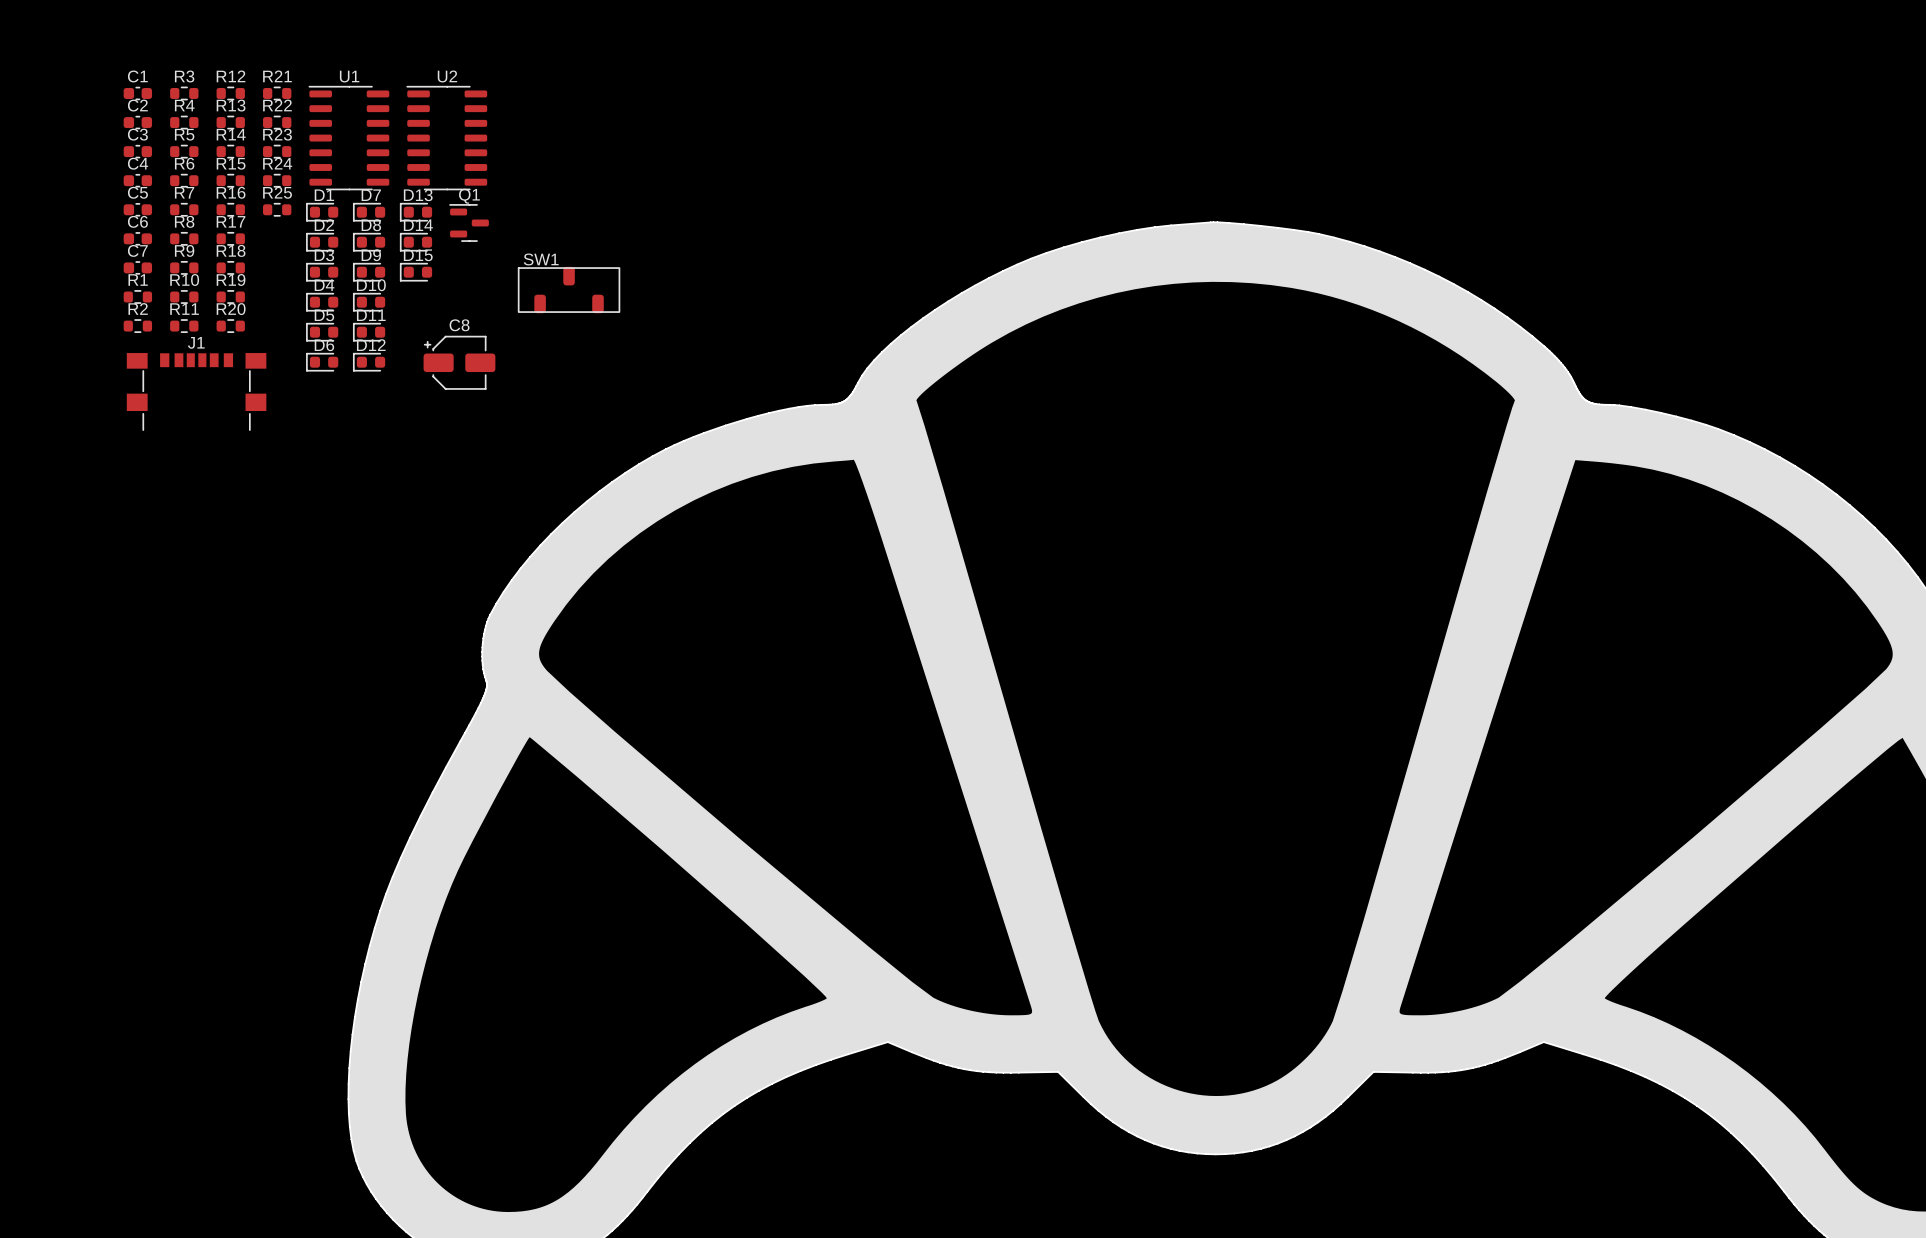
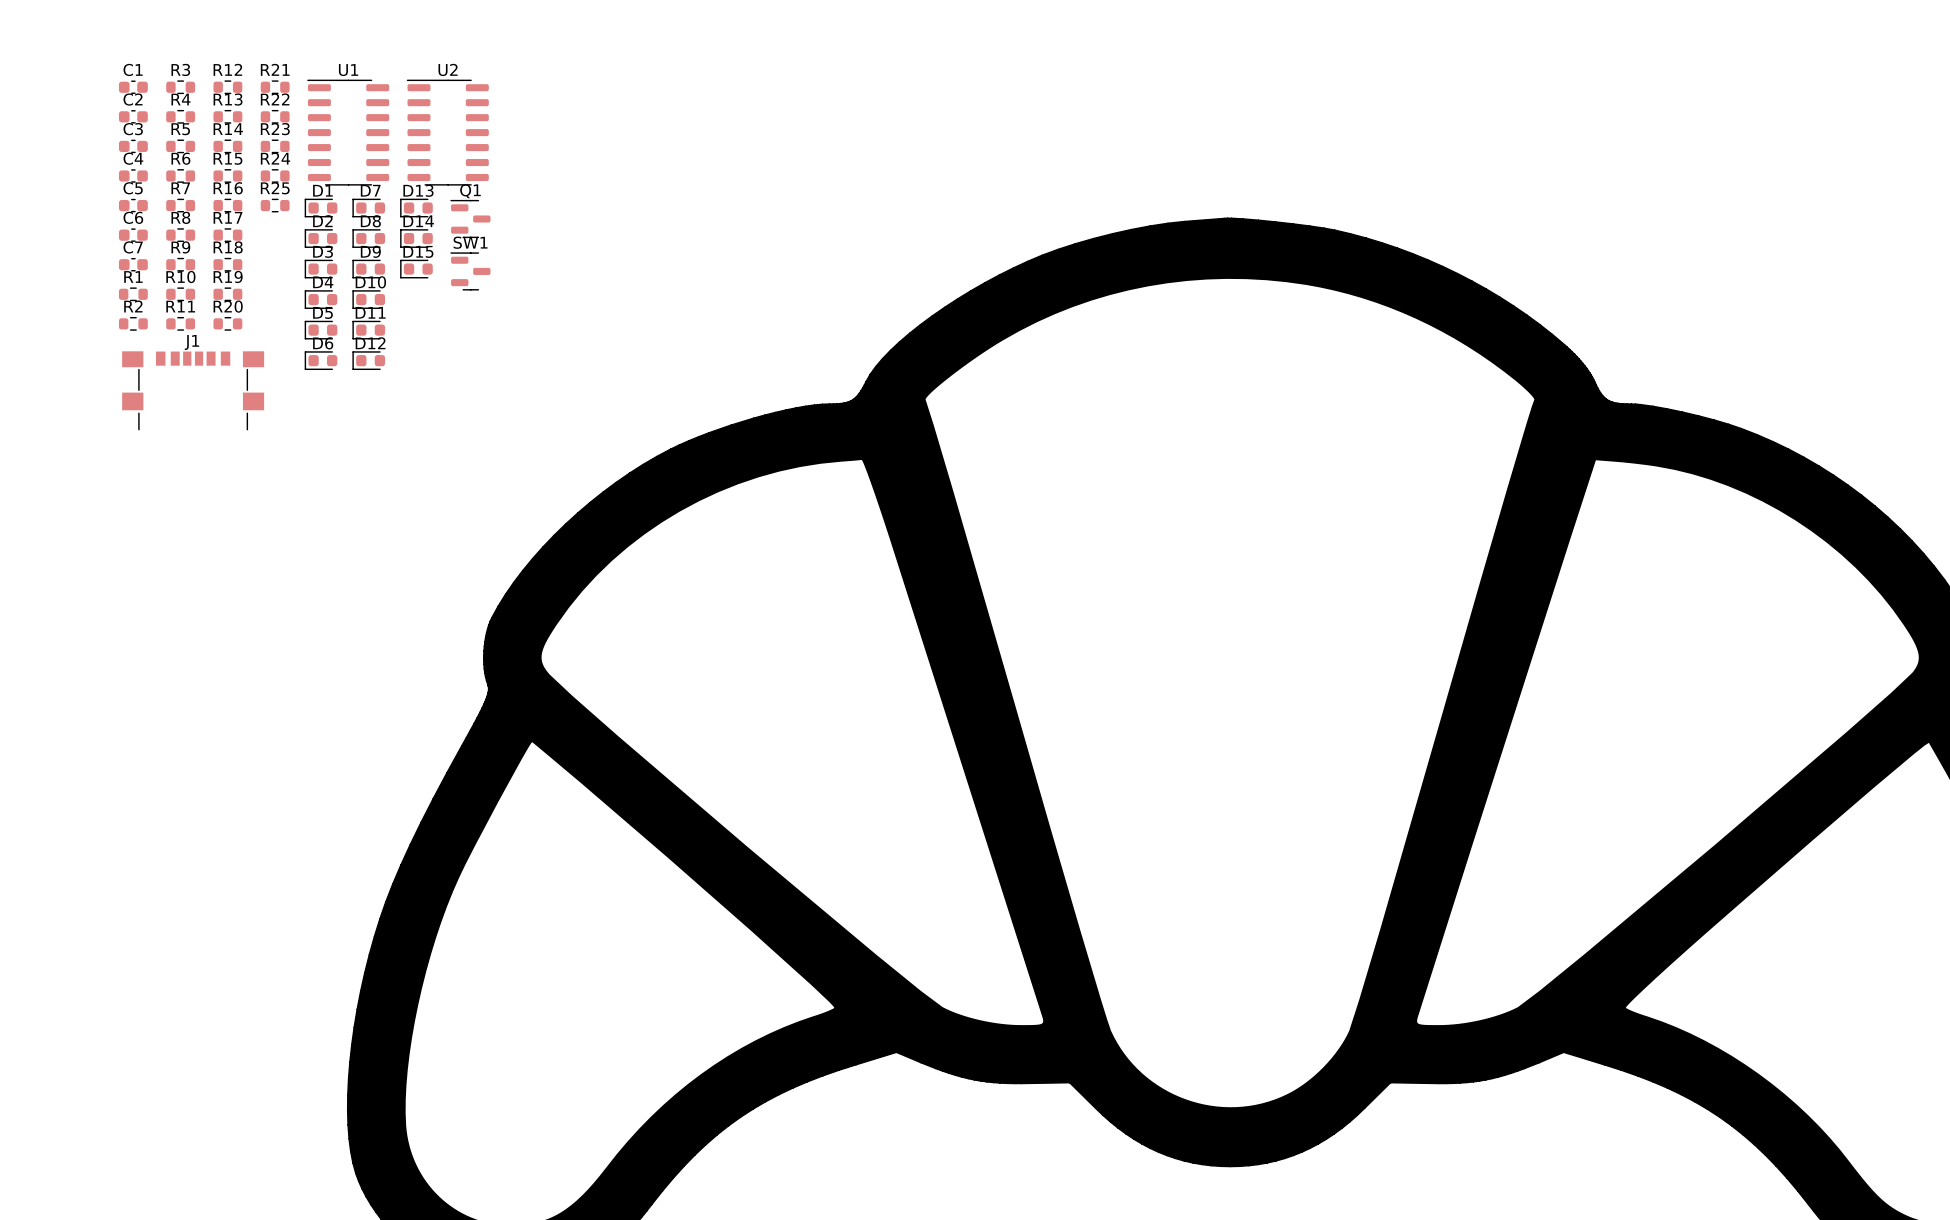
SW1 name position: SW1 (541, 259) -> SW1 (470, 242)
SW1 footprint: [518, 266, 621, 314] -> [450, 252, 491, 291]
C8: (459, 362) -> none

